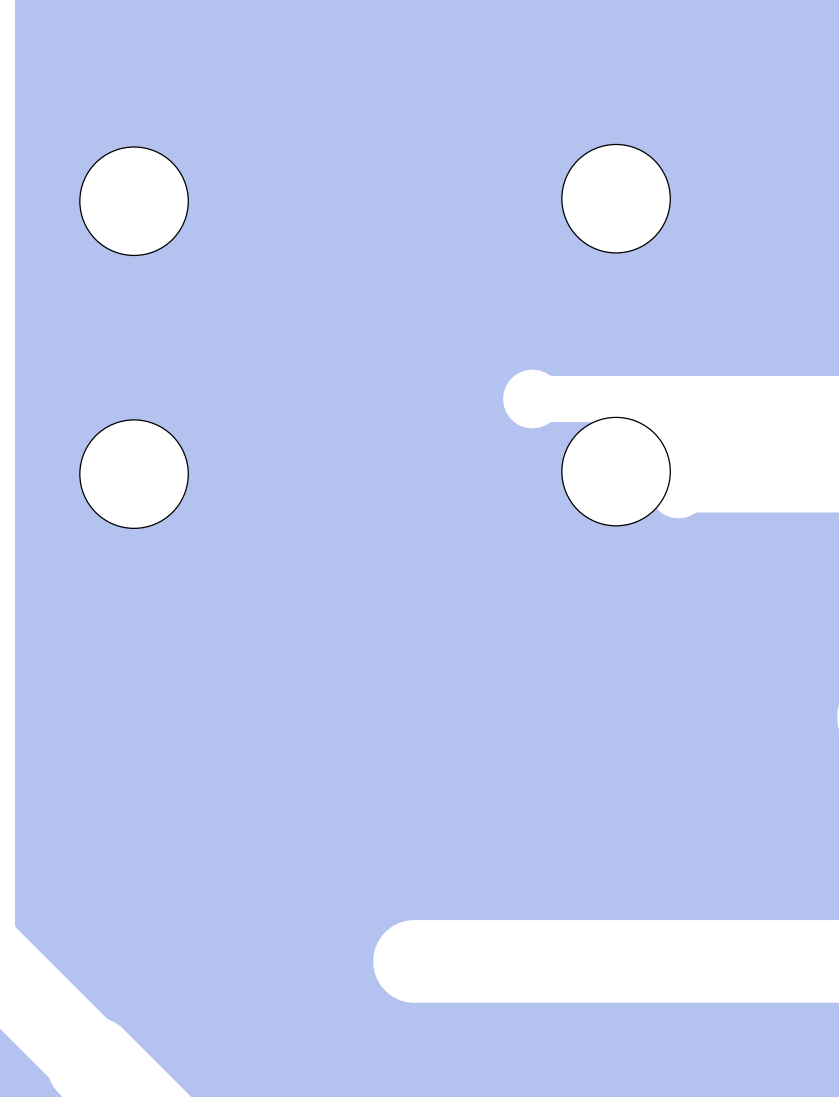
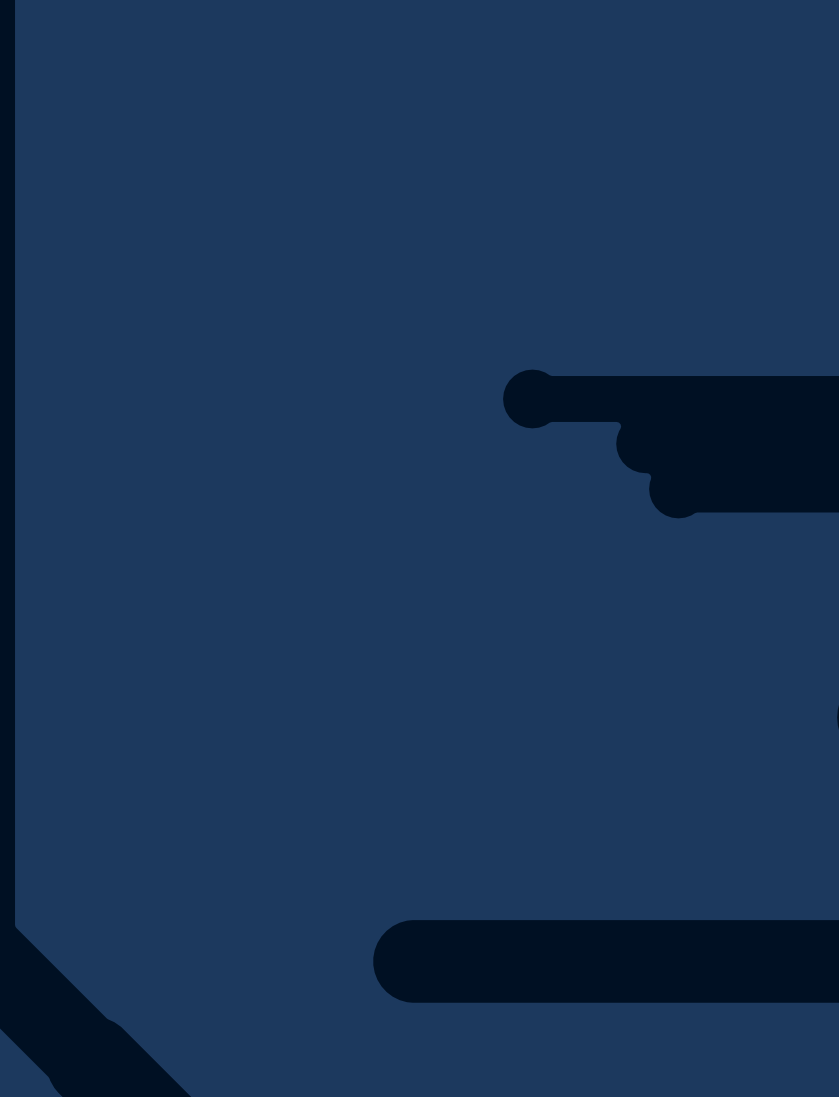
part: (616, 198) -> none
part: (134, 201) -> none
part: (616, 471) -> none
part: (134, 474) -> none

